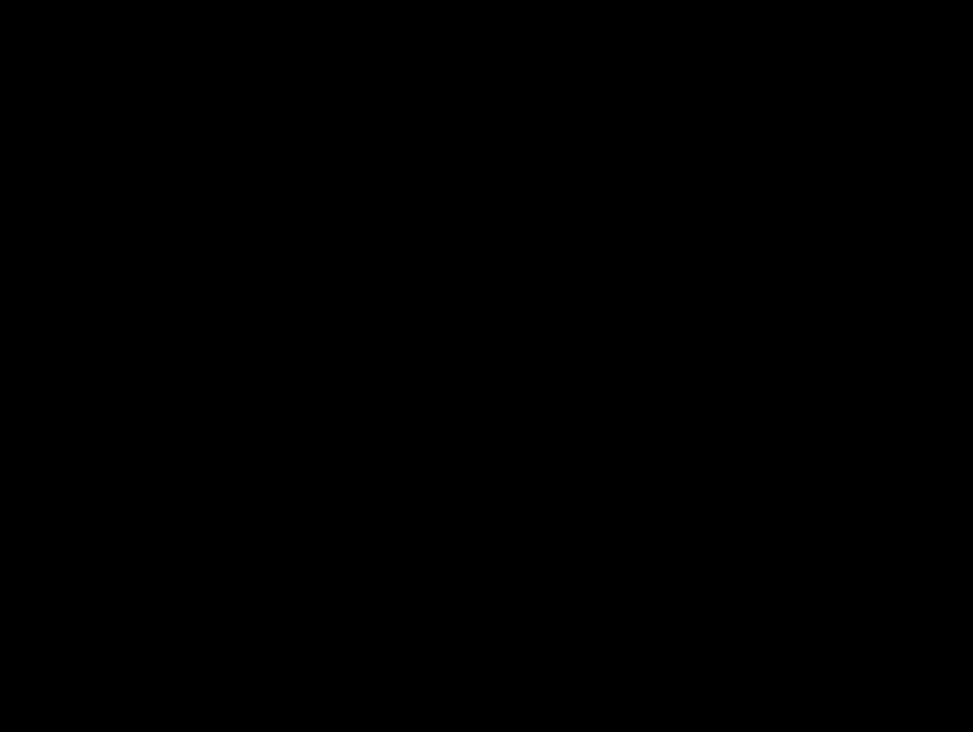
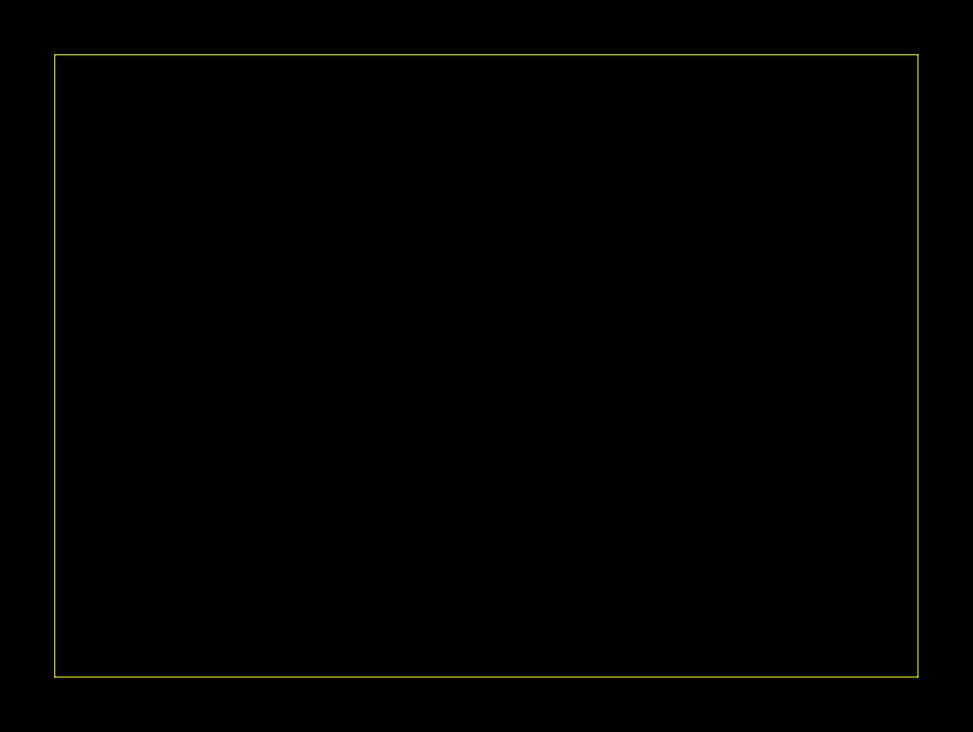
board edge: none -> (54, 54) (917, 54) (917, 677) (54, 677) (54, 54)

